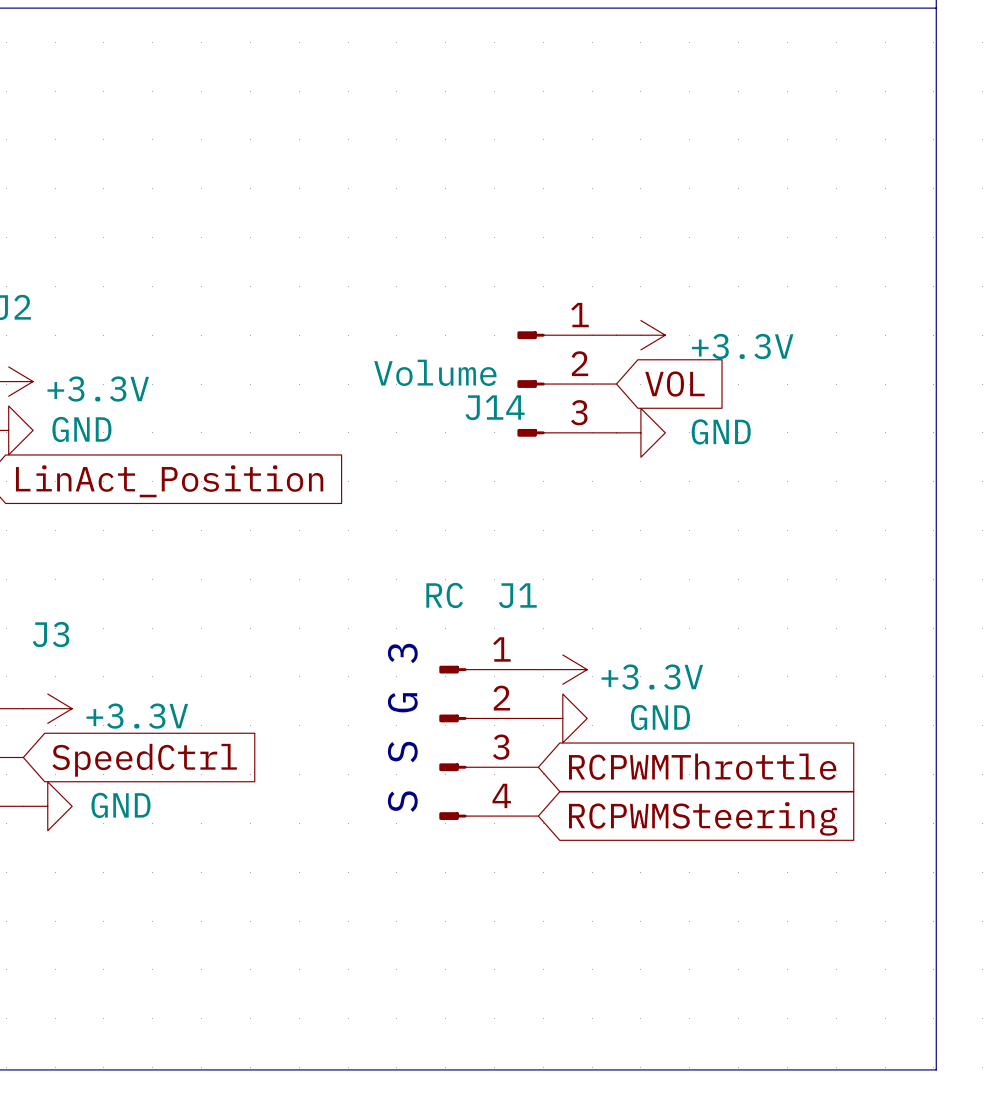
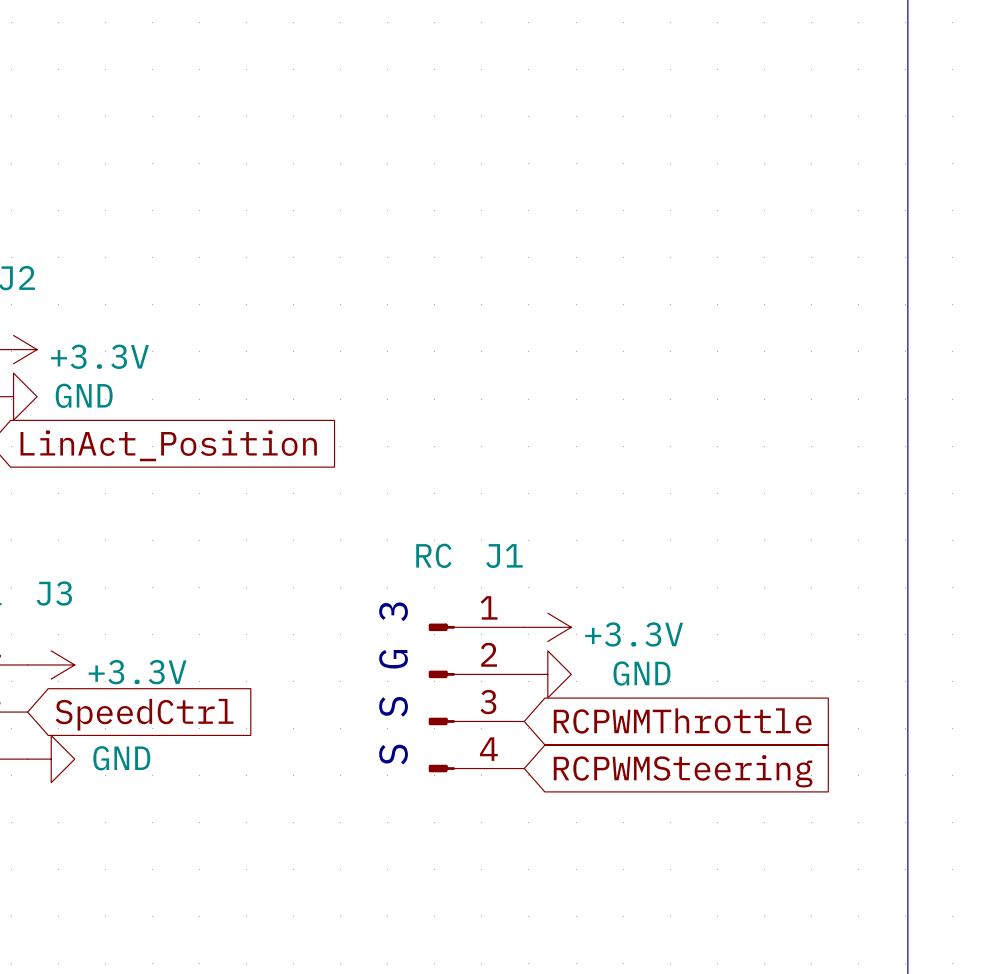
power symbol: +3.3V (640, 335) -> none
J14: Volume (566, 384) -> none
global label: VOL (674, 384) -> none
power symbol: GND (640, 432) -> none

